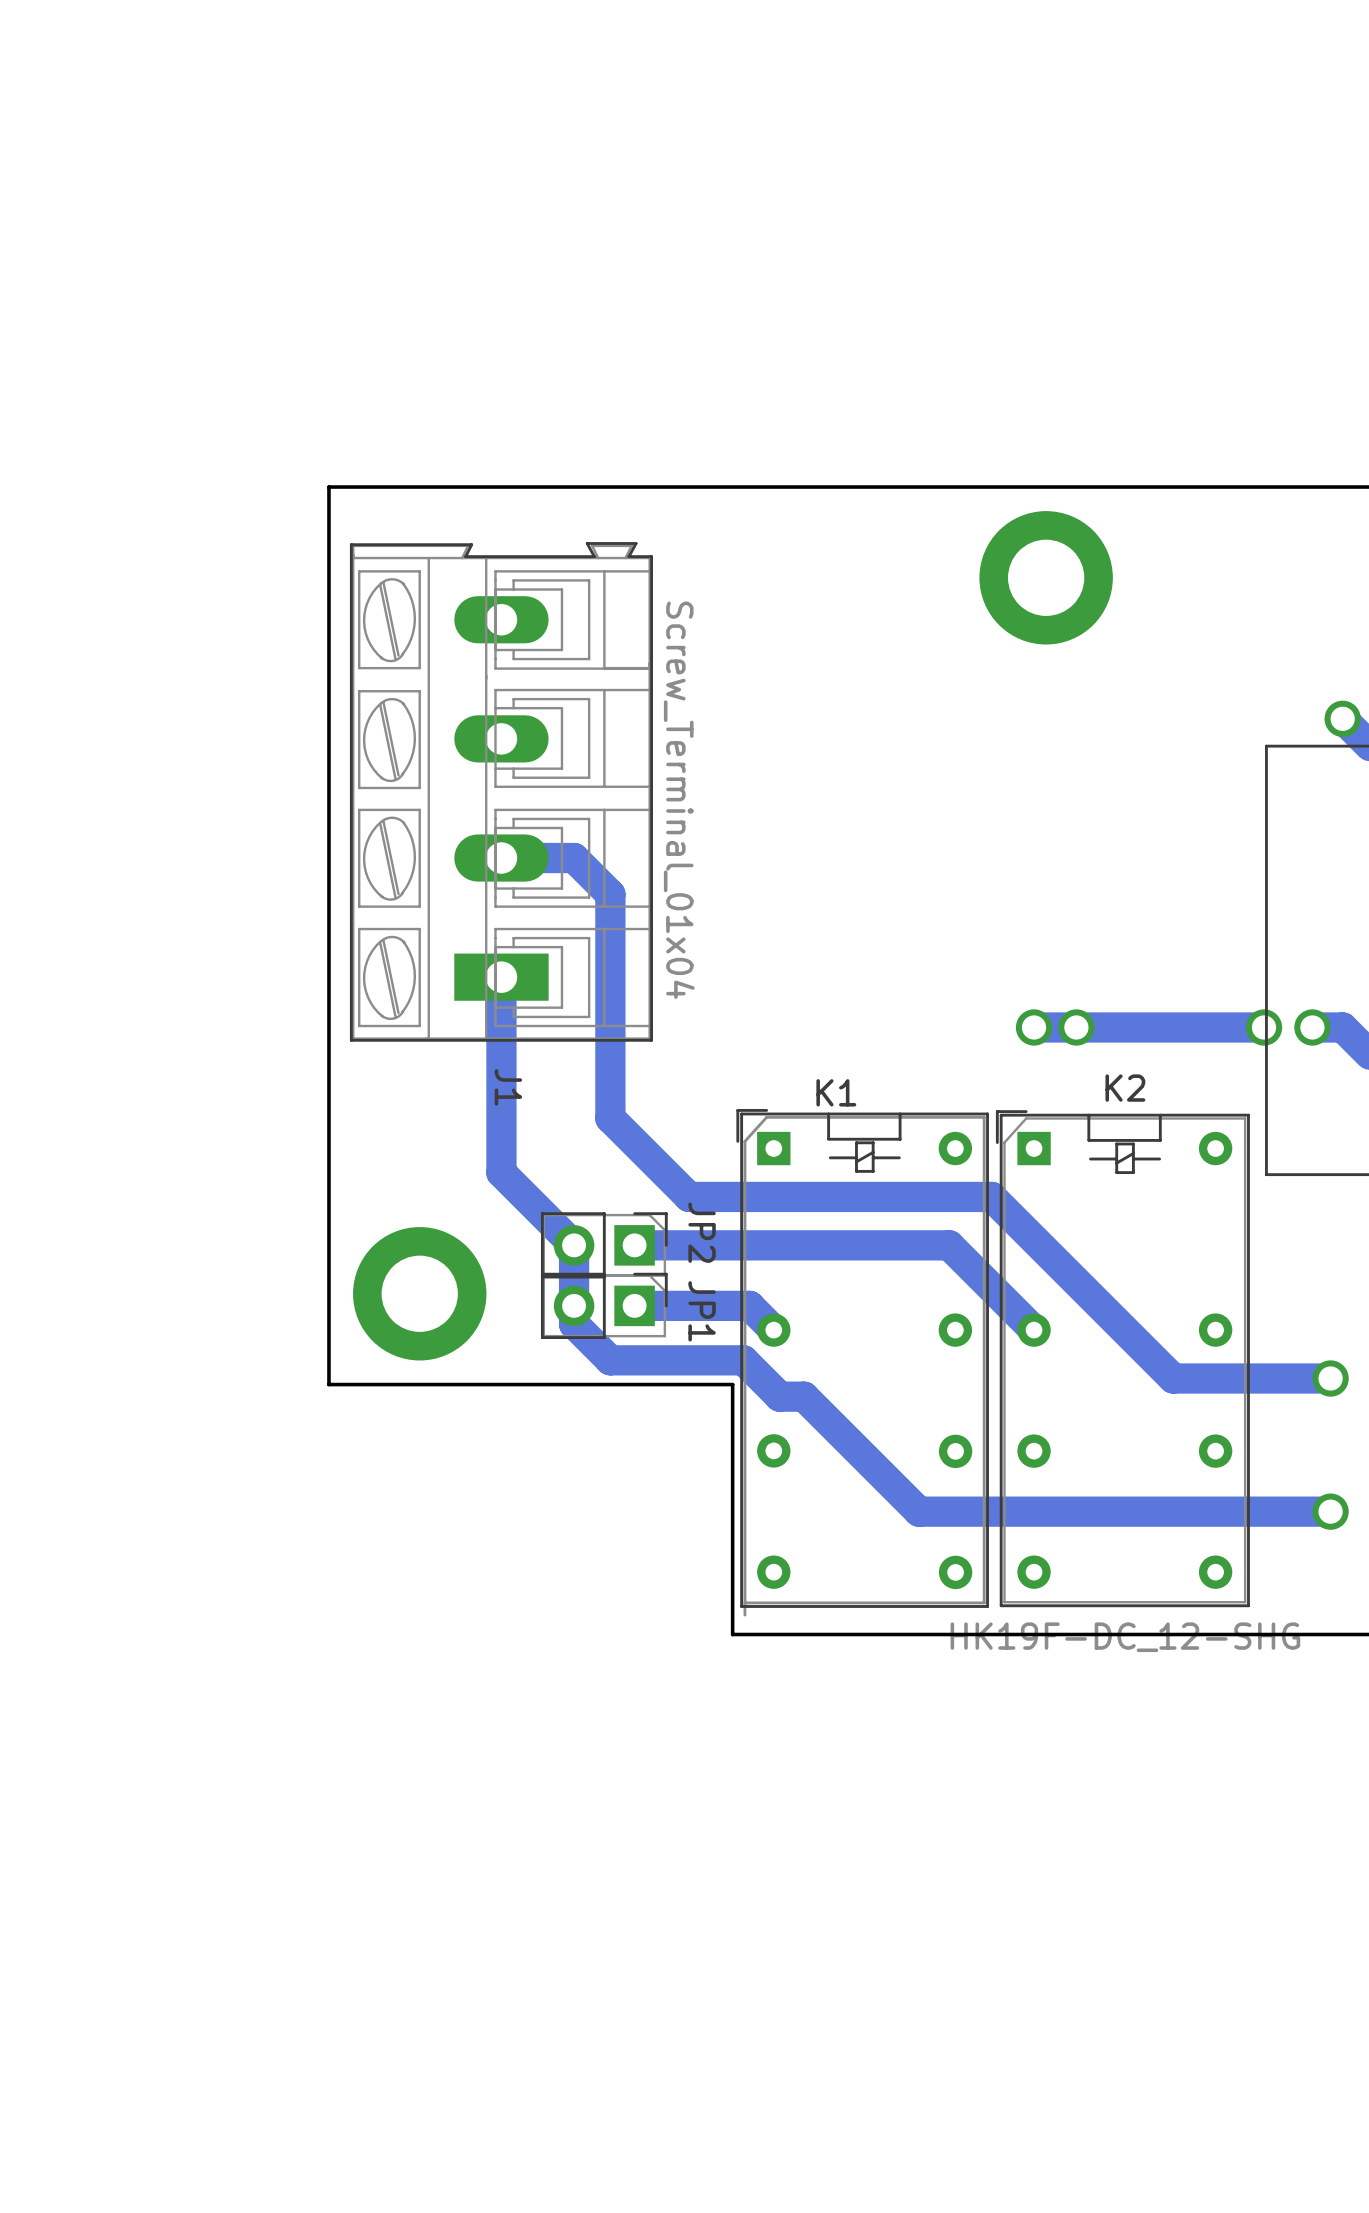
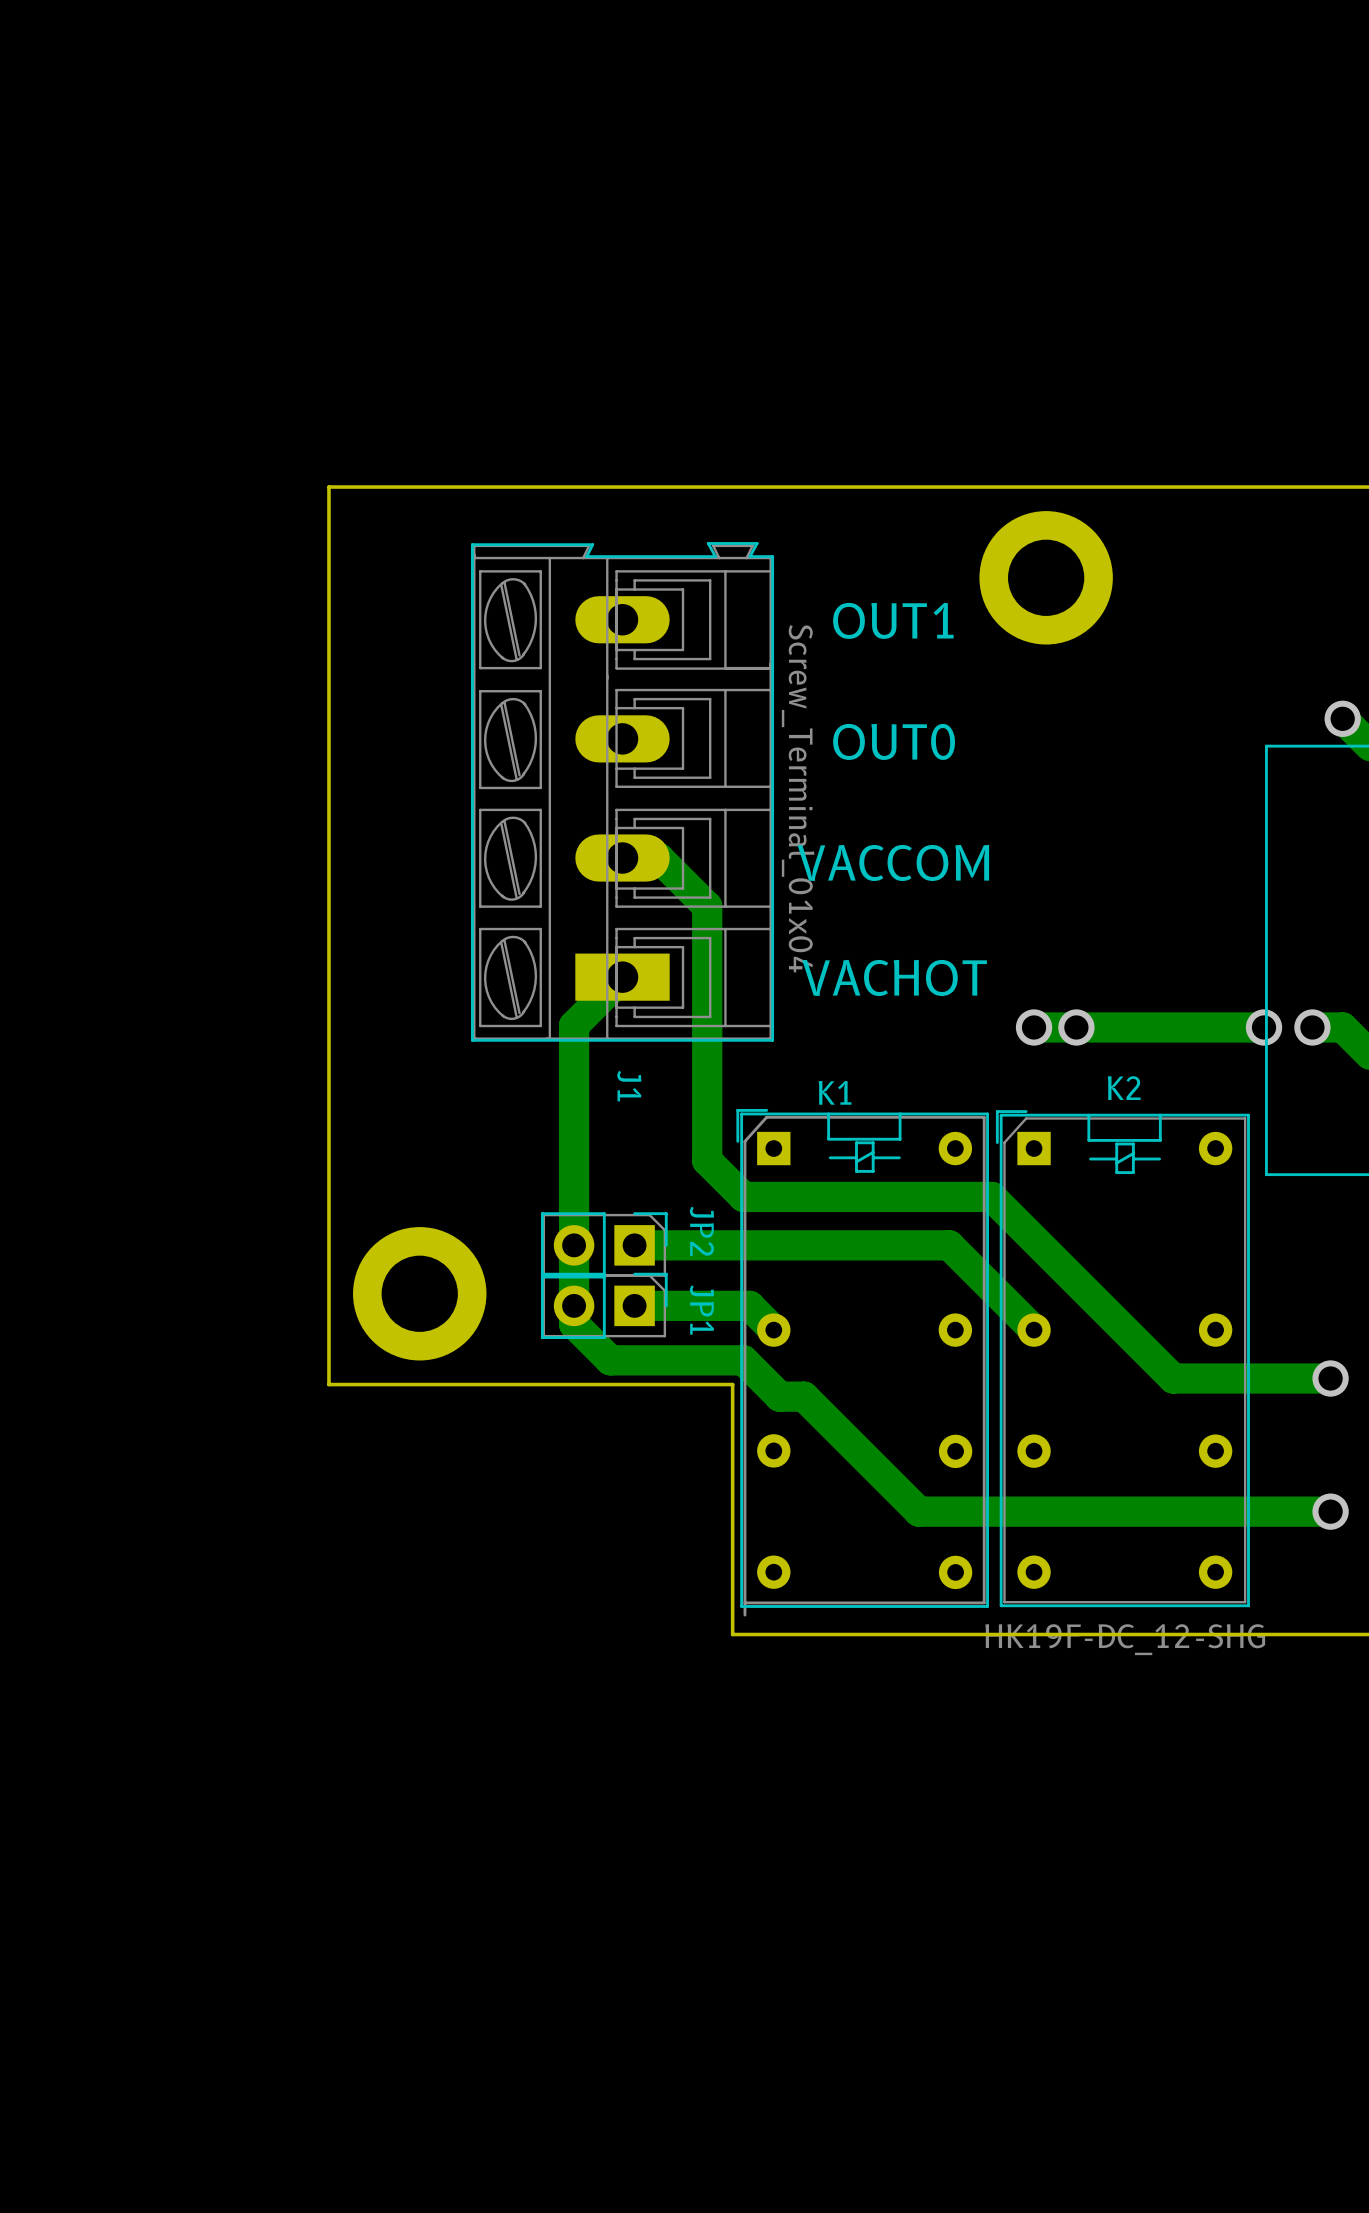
text: none -> OUT1 (893, 620)
text: none -> OUT0 (894, 741)
J1 position: (501, 791) -> (622, 791)
track: (501, 858) (574, 858) (610, 894) (610, 1118) (689, 1196) (743, 1196) -> (622, 858) (658, 858) (707, 906) (707, 1160) (743, 1196)
text: none -> VACCOM (893, 862)
track: (501, 977) (501, 1172) (574, 1245) -> (622, 977) (574, 1025) (574, 1245)
text: none -> VACHOT (894, 977)

